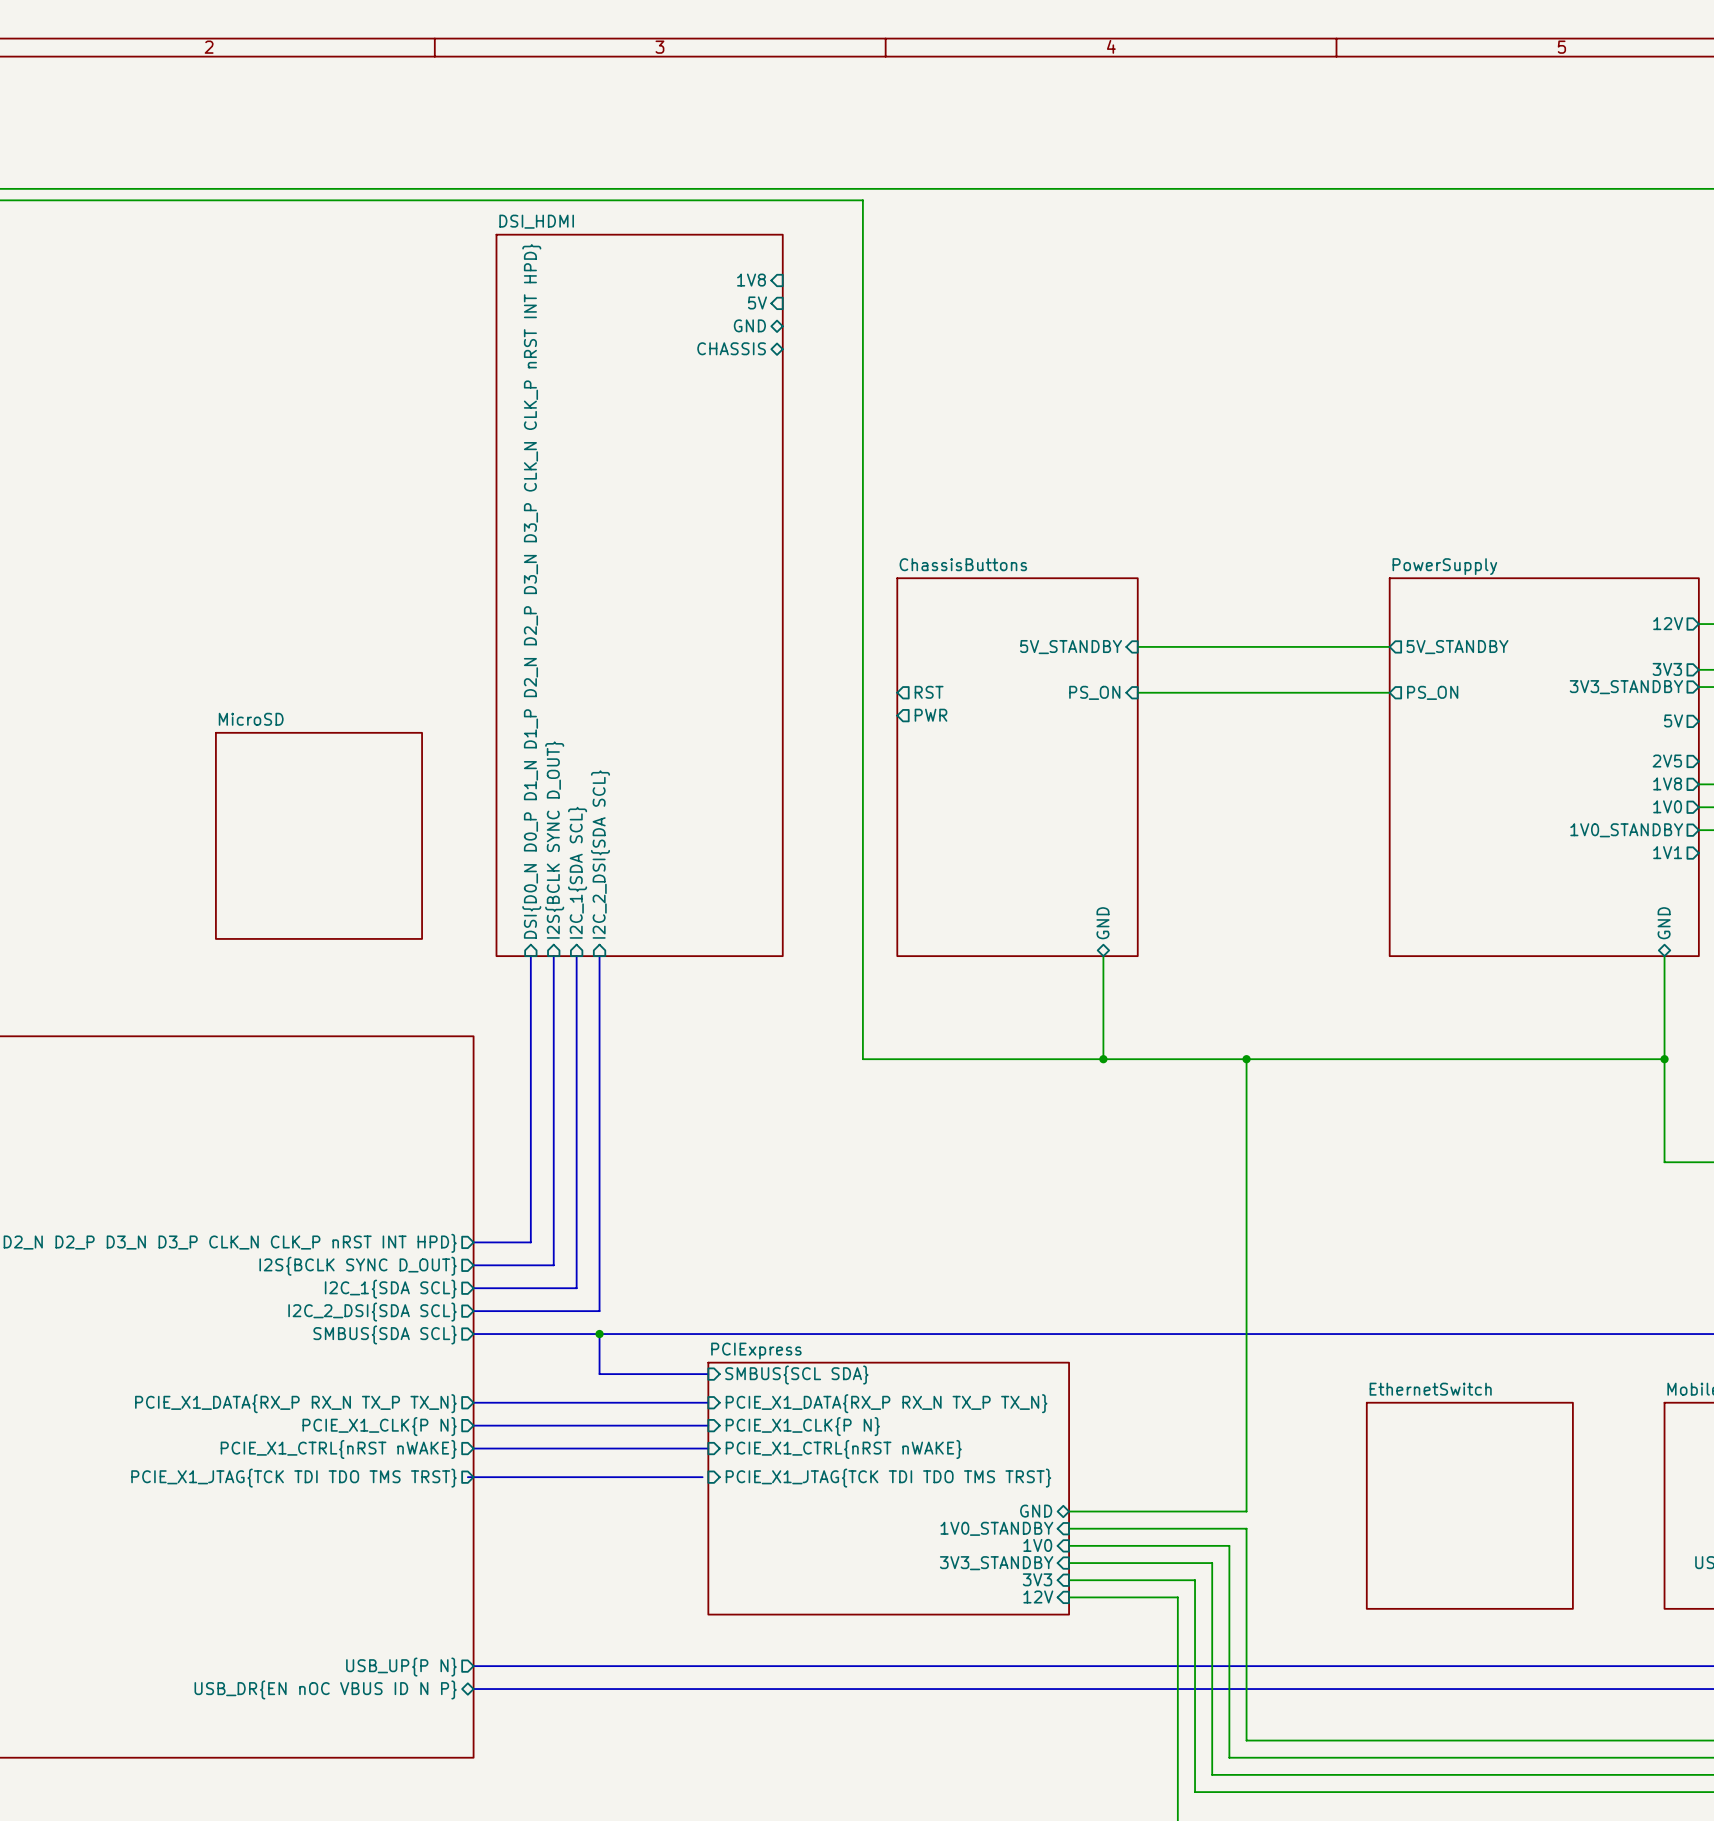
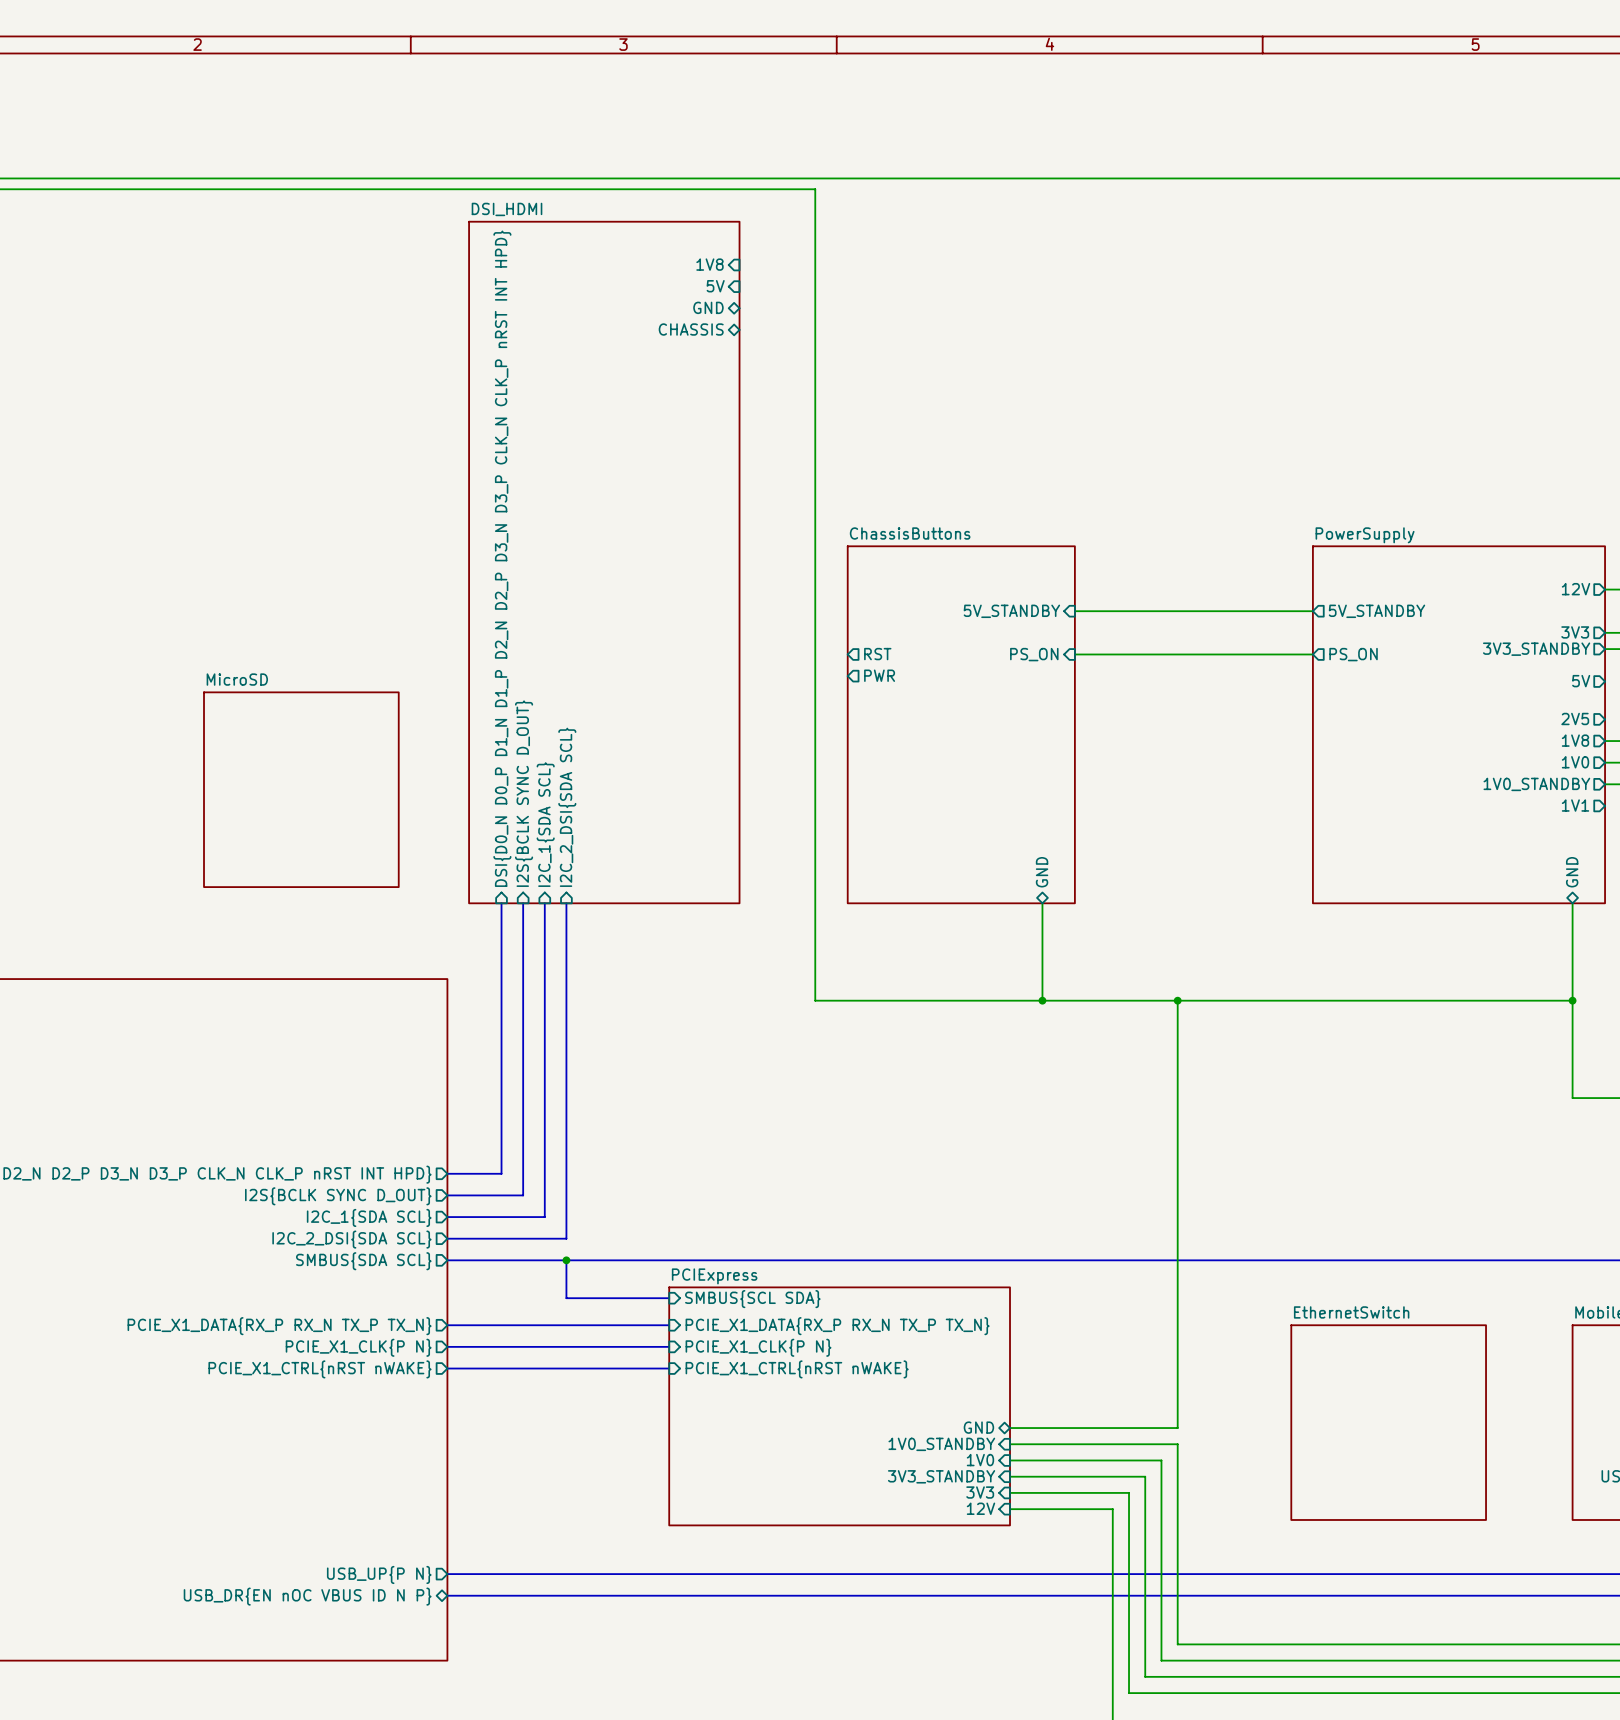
bus: (467, 1477) (702, 1477) -> none
sheet pin: PCIE_X1_JTAG{TCK TDI TDO TMS TRST} (294, 1478) -> none
sheet pin: PCIE_X1_JTAG{TCK TDI TDO TMS TRST} (888, 1478) -> none

